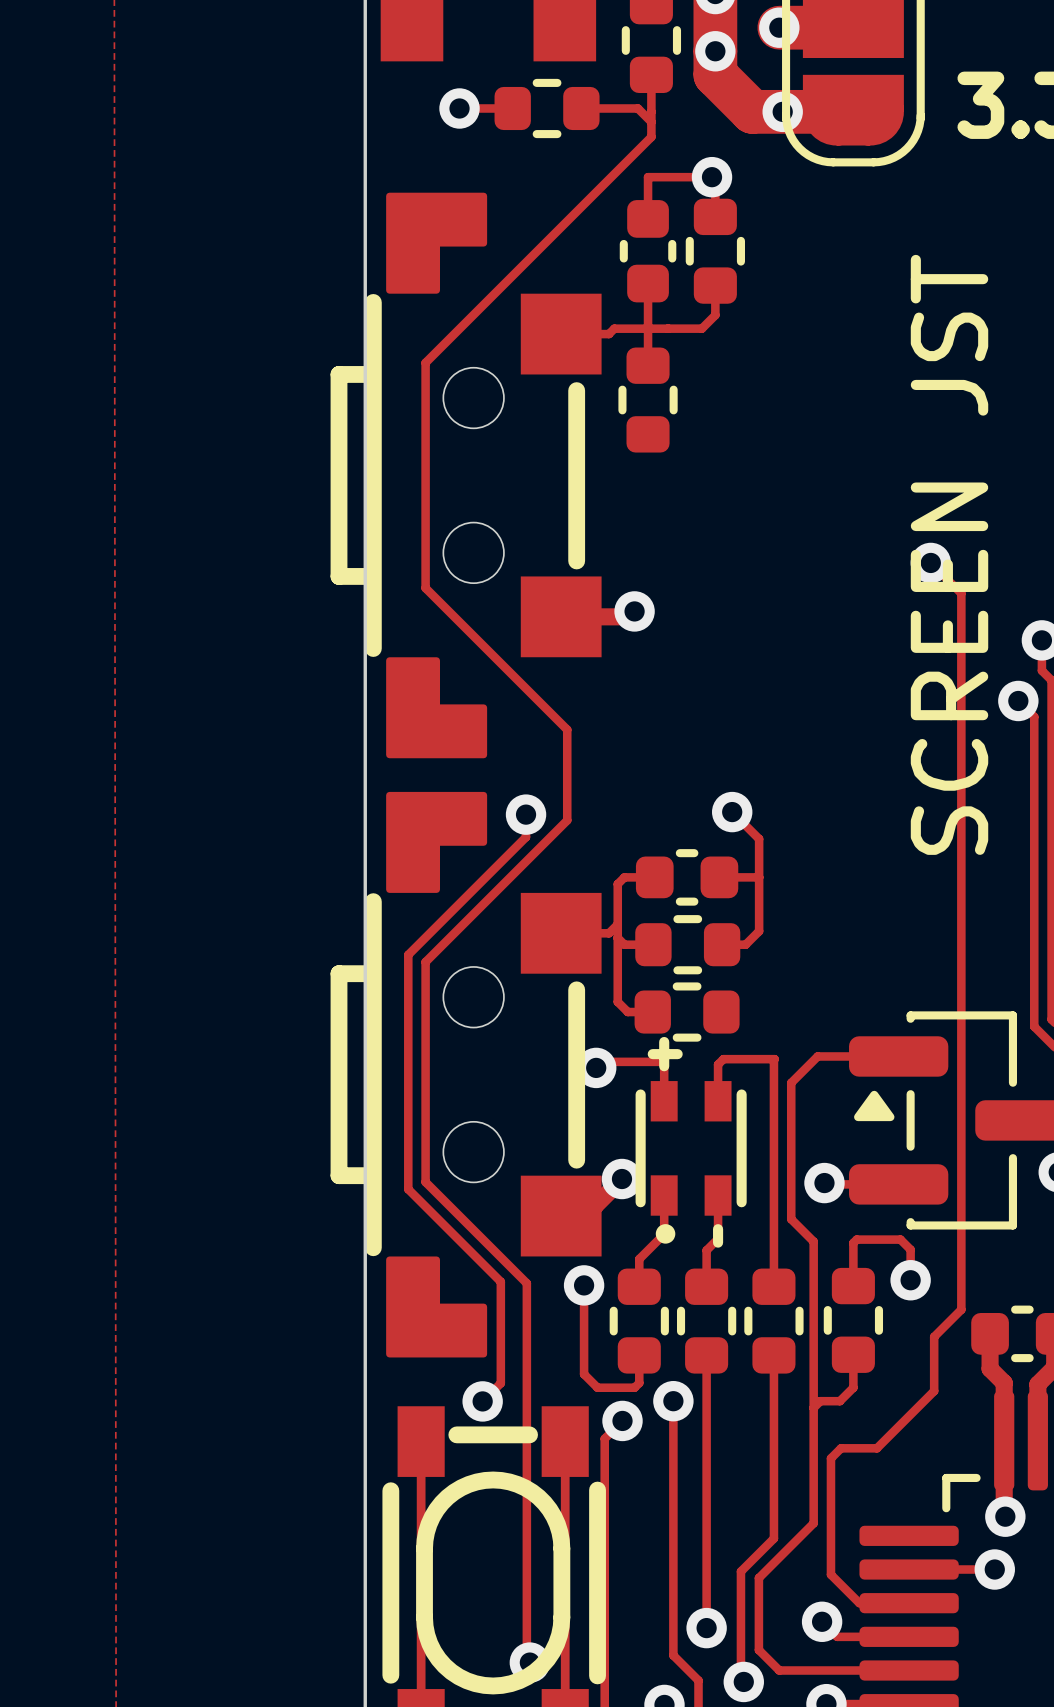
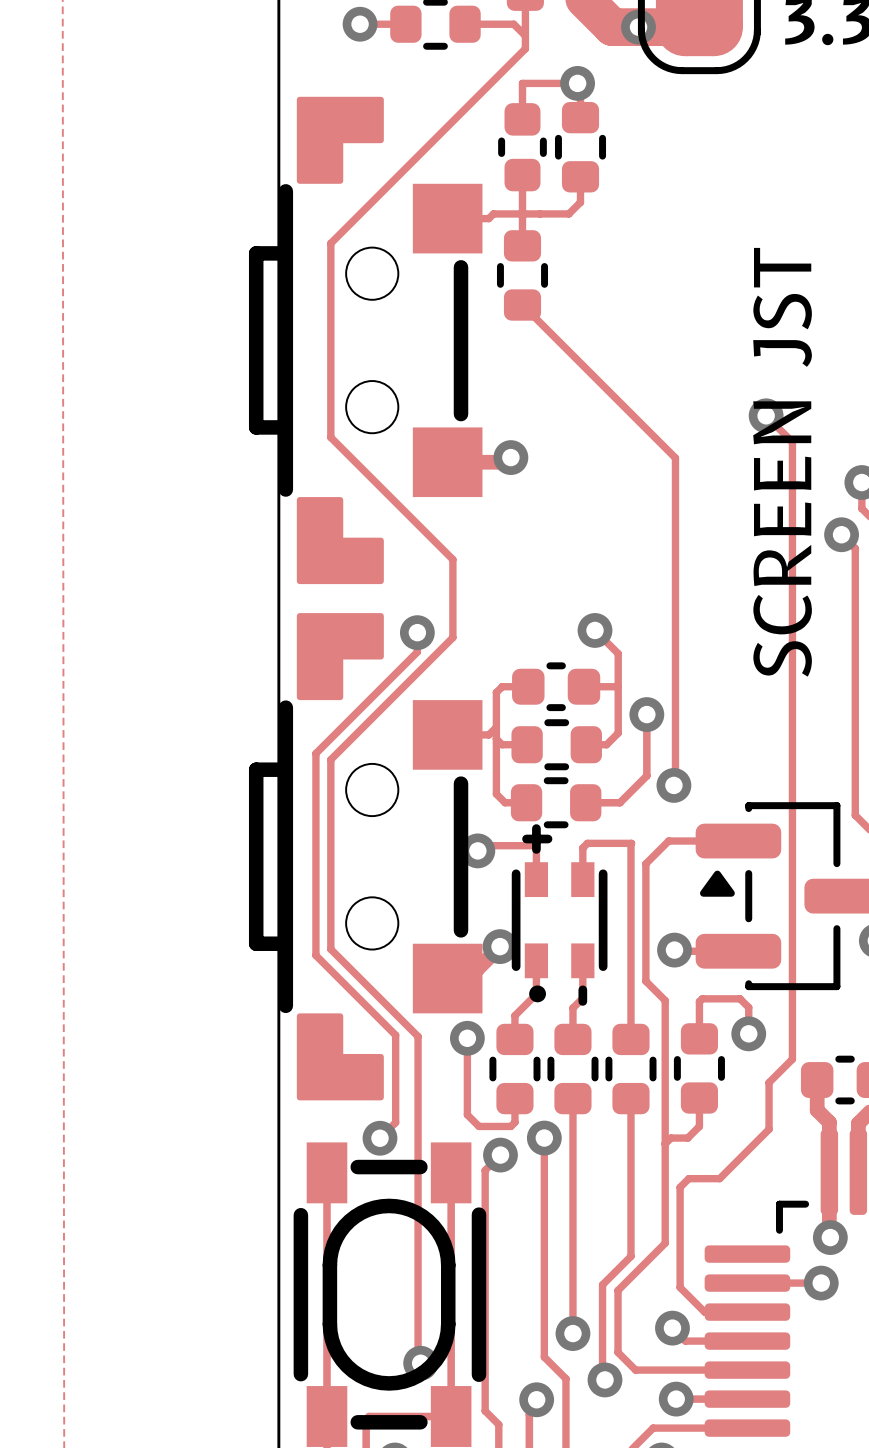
track: none -> (522, 305) (675, 457) (675, 783) (673, 785)
track: none -> (646, 714) (646, 775) (619, 802) (585, 802)
via: none -> (646, 714)
via: none -> (673, 785)

